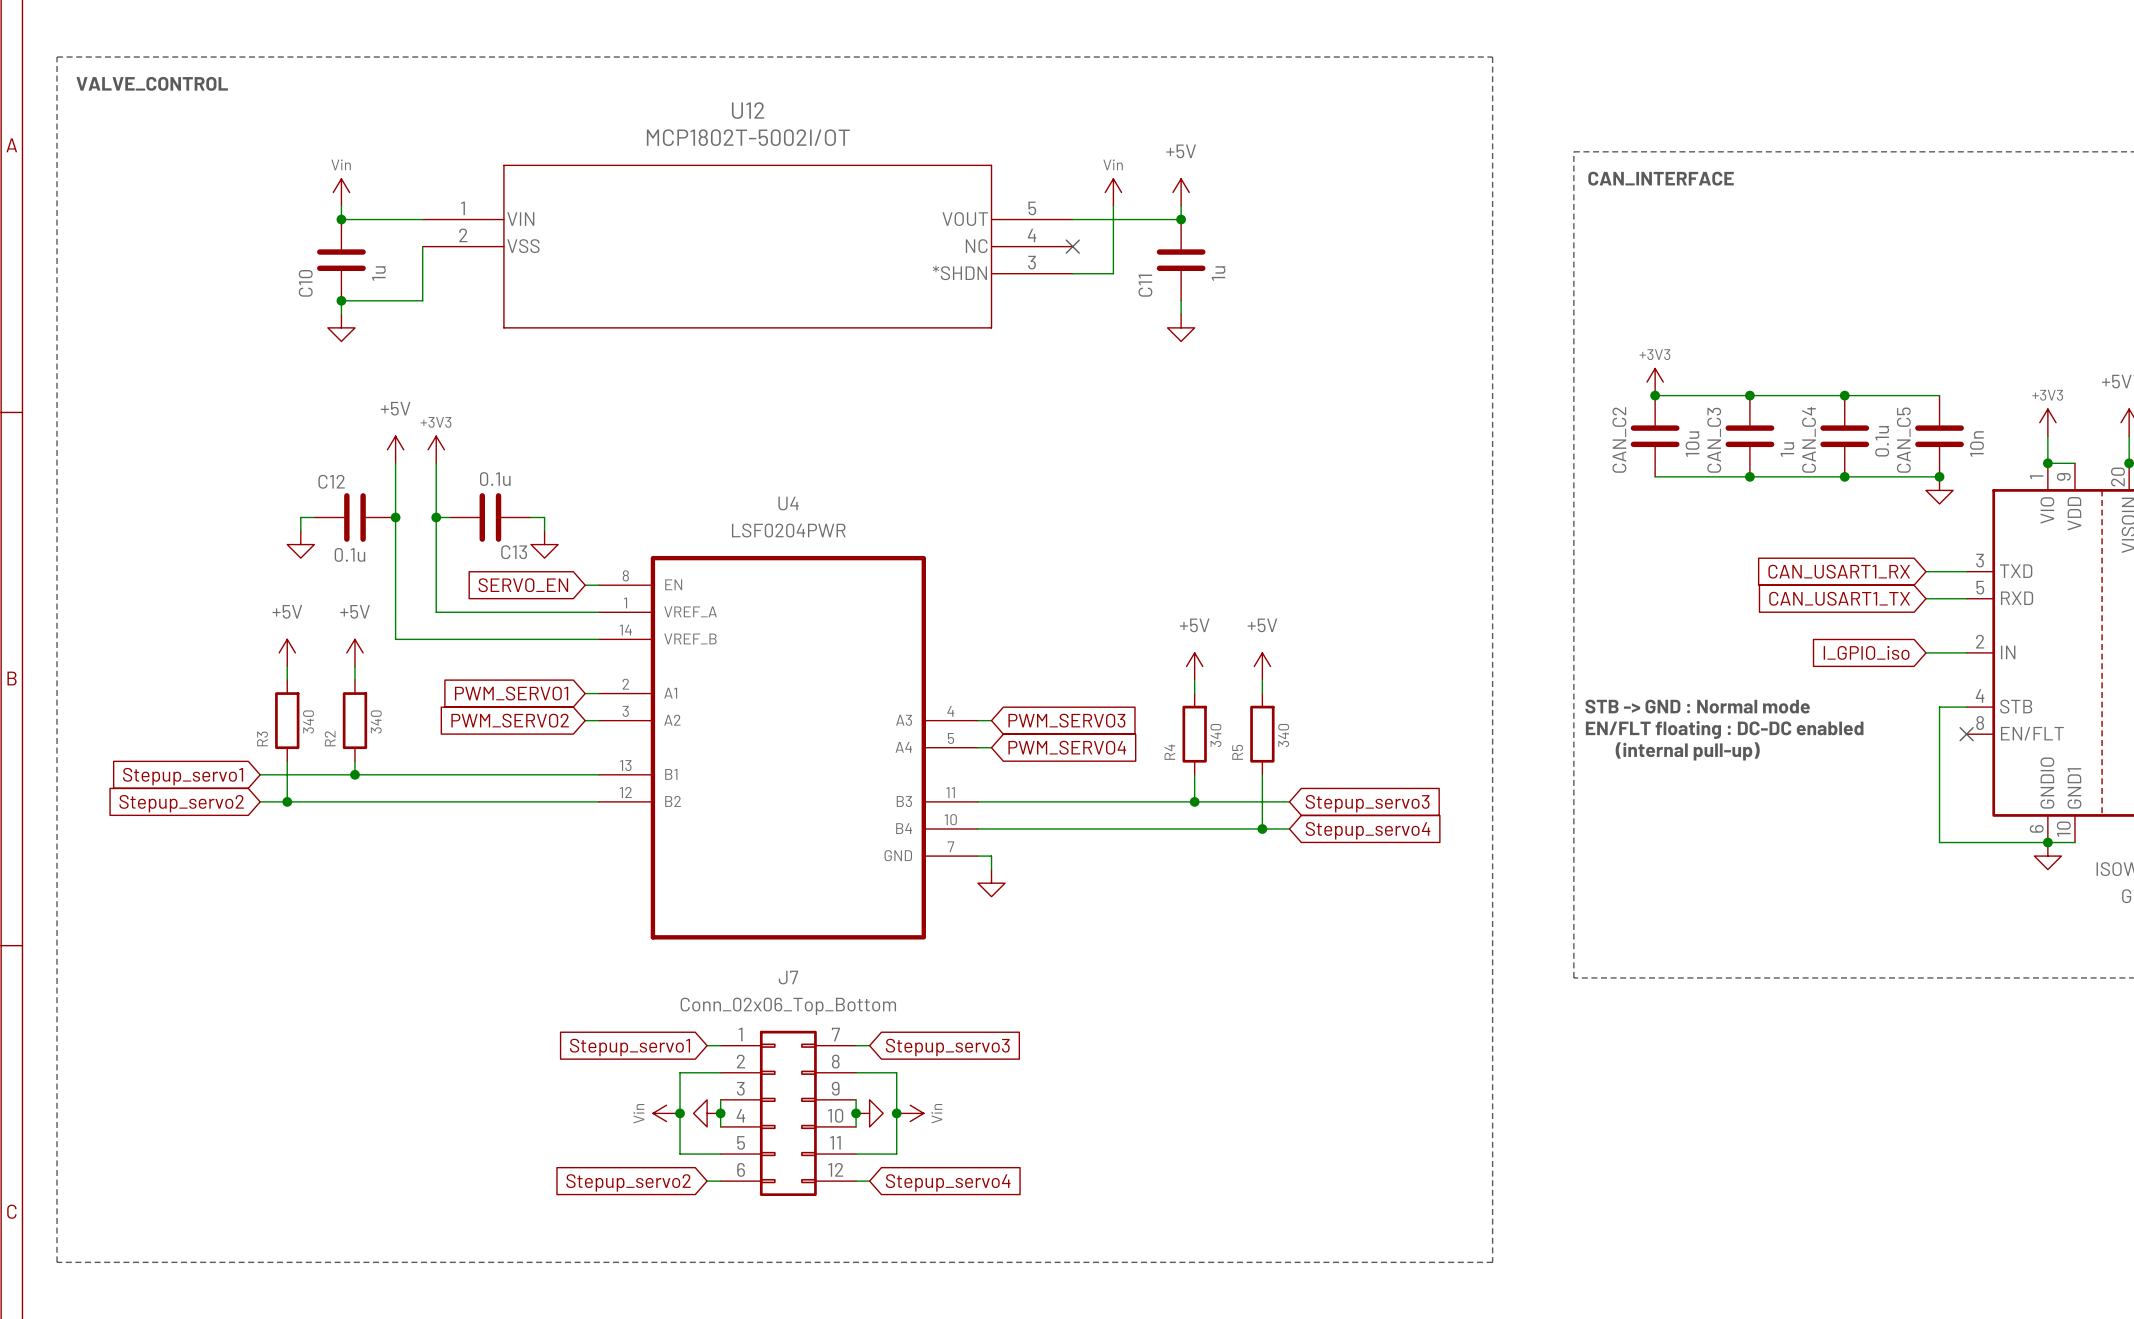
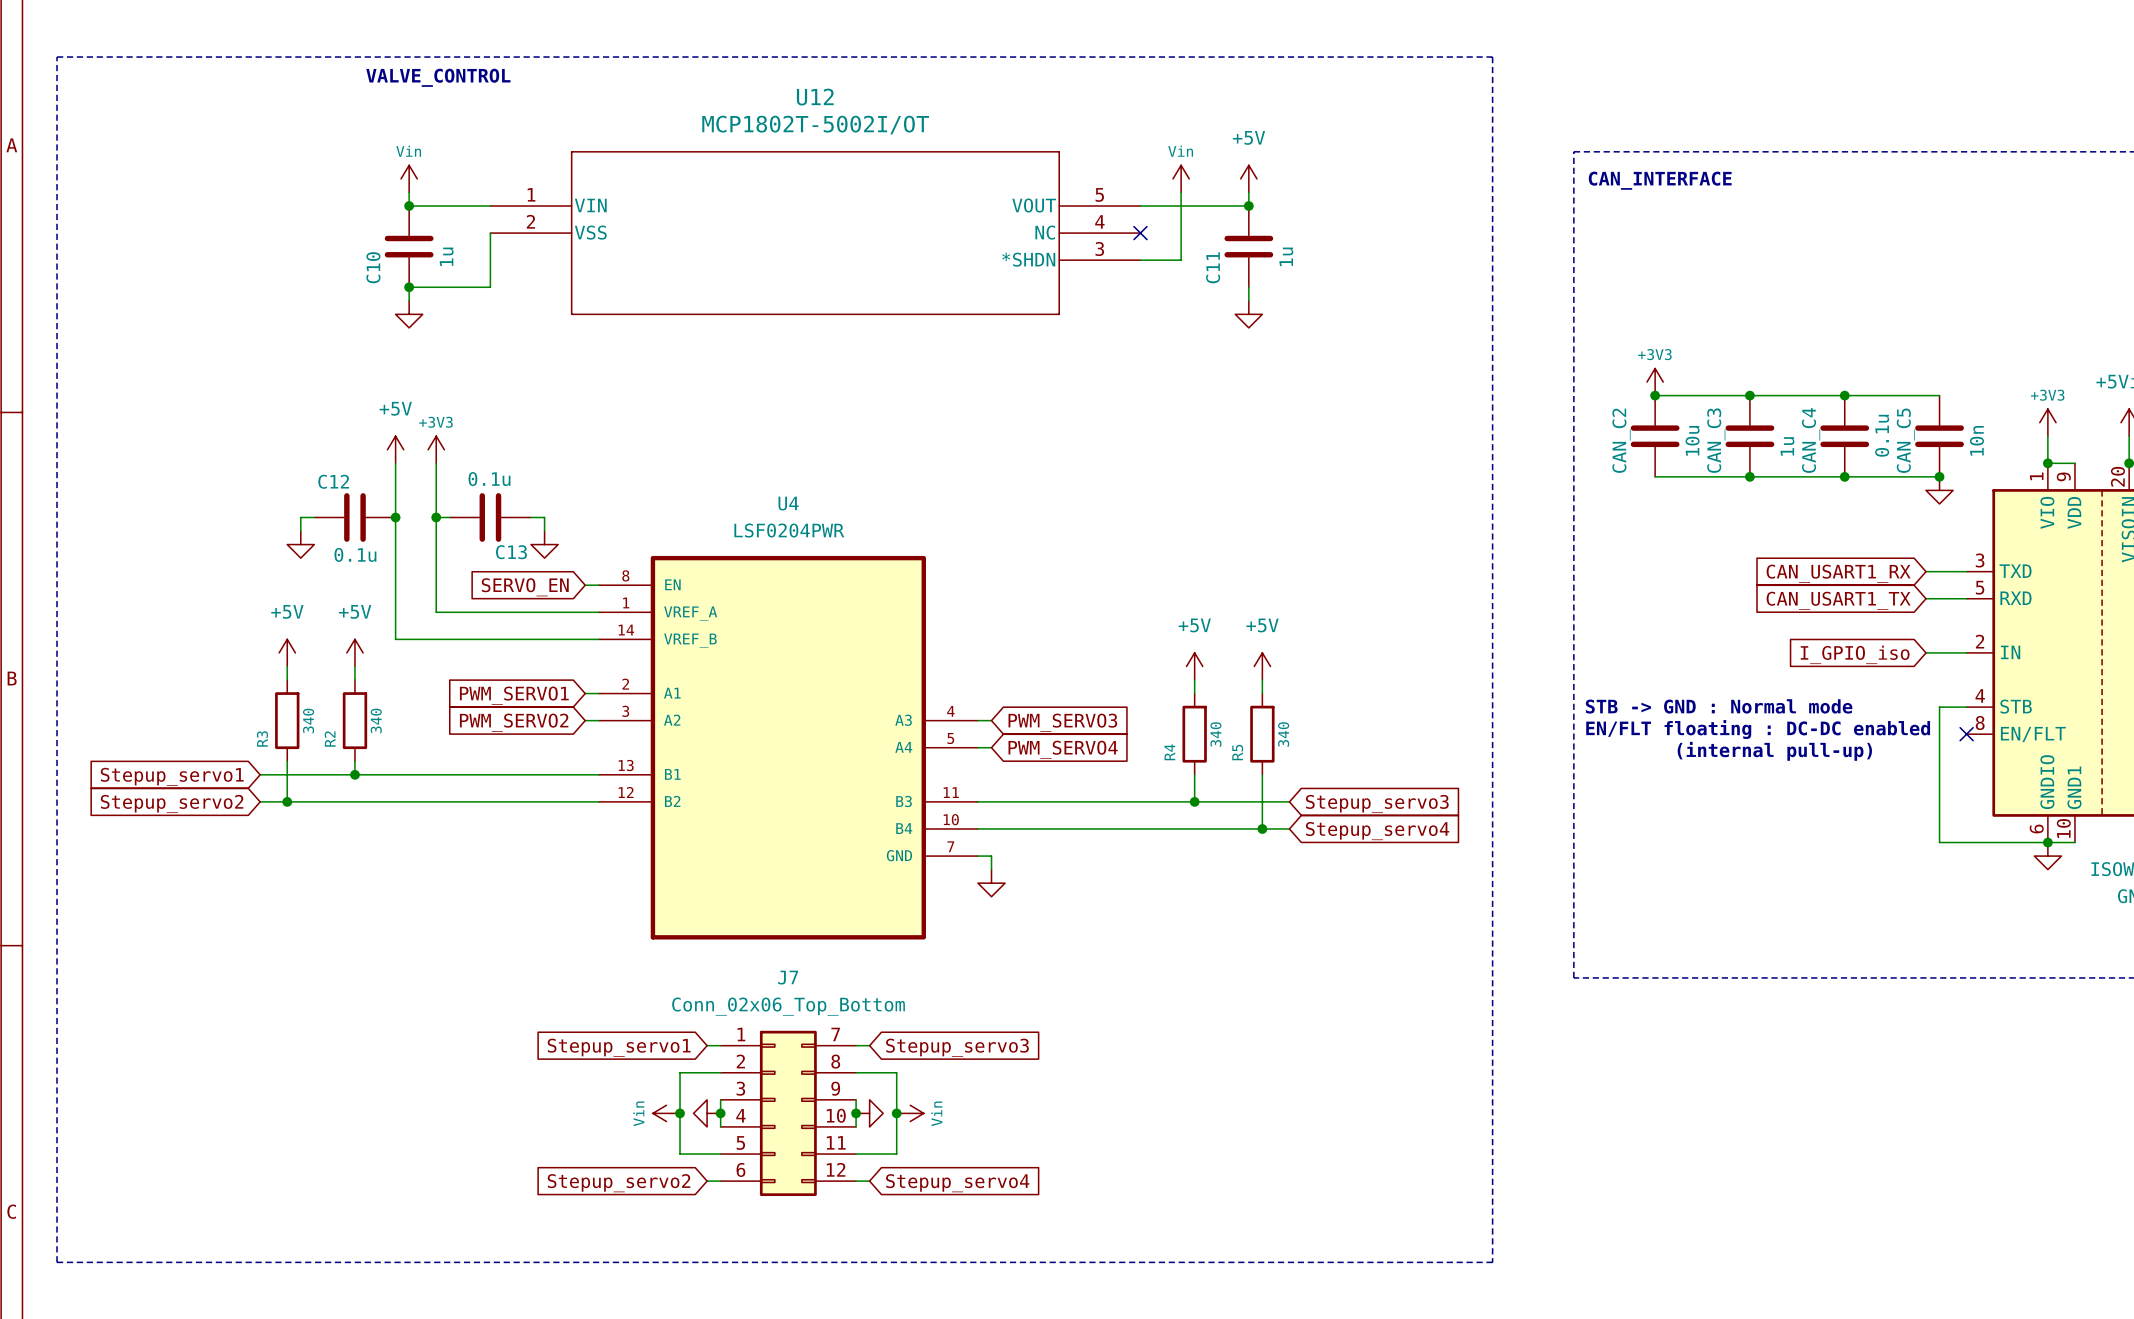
text: none -> VALVE_CONTROL (438, 77)
text: VALVE_CONTROL (152, 83) -> none
power symbol position: Vin (341, 192) -> Vin (409, 178)
power symbol position: Vin (1113, 192) -> Vin (1181, 178)
power symbol position: +5V (1181, 192) -> +5V (1248, 178)
wire: none -> (1248, 192) (1248, 205) (1140, 205)
wire: (341, 205) (341, 219) (422, 219) -> (409, 192) (409, 205) (490, 205)
junction: none -> (409, 205)
wire: (1113, 205) (1113, 273) (1072, 273) -> none
junction: none -> (1248, 205)
junction: (341, 219) -> none
wire: (1072, 219) (1181, 219) -> (1140, 260) (1181, 260) (1181, 219)
junction: (1181, 219) -> none
no-connect mark: none -> (1140, 233)
wire: (422, 246) (422, 300) (341, 300) (341, 314) -> (490, 233) (490, 287) (409, 287) (409, 300)
U12 position: (747, 246) -> (815, 233)
no-connect mark: (1072, 246) -> none
C10 position: (341, 260) -> (409, 246)
C11 position: (1181, 260) -> (1248, 246)
junction: none -> (409, 287)
junction: (341, 300) -> none
wire: (1181, 300) (1181, 314) -> (1248, 287) (1248, 300)
power symbol position: (341, 327) -> (409, 314)
power symbol position: (1181, 327) -> (1248, 314)

